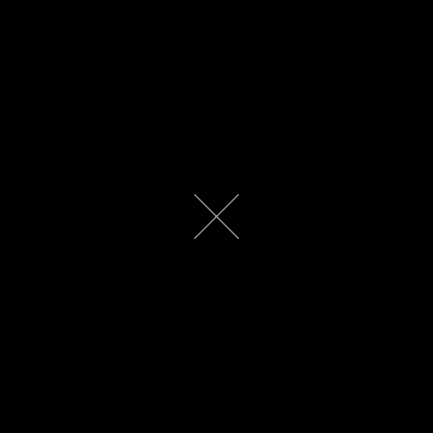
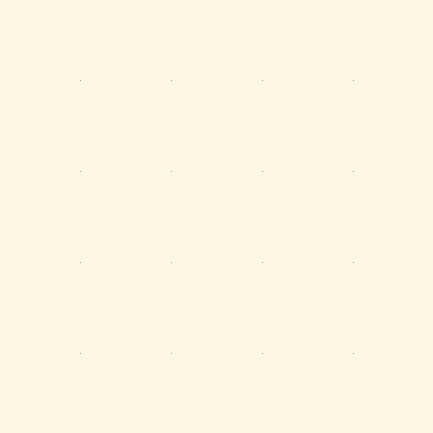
no-connect mark: (216, 216) -> none

